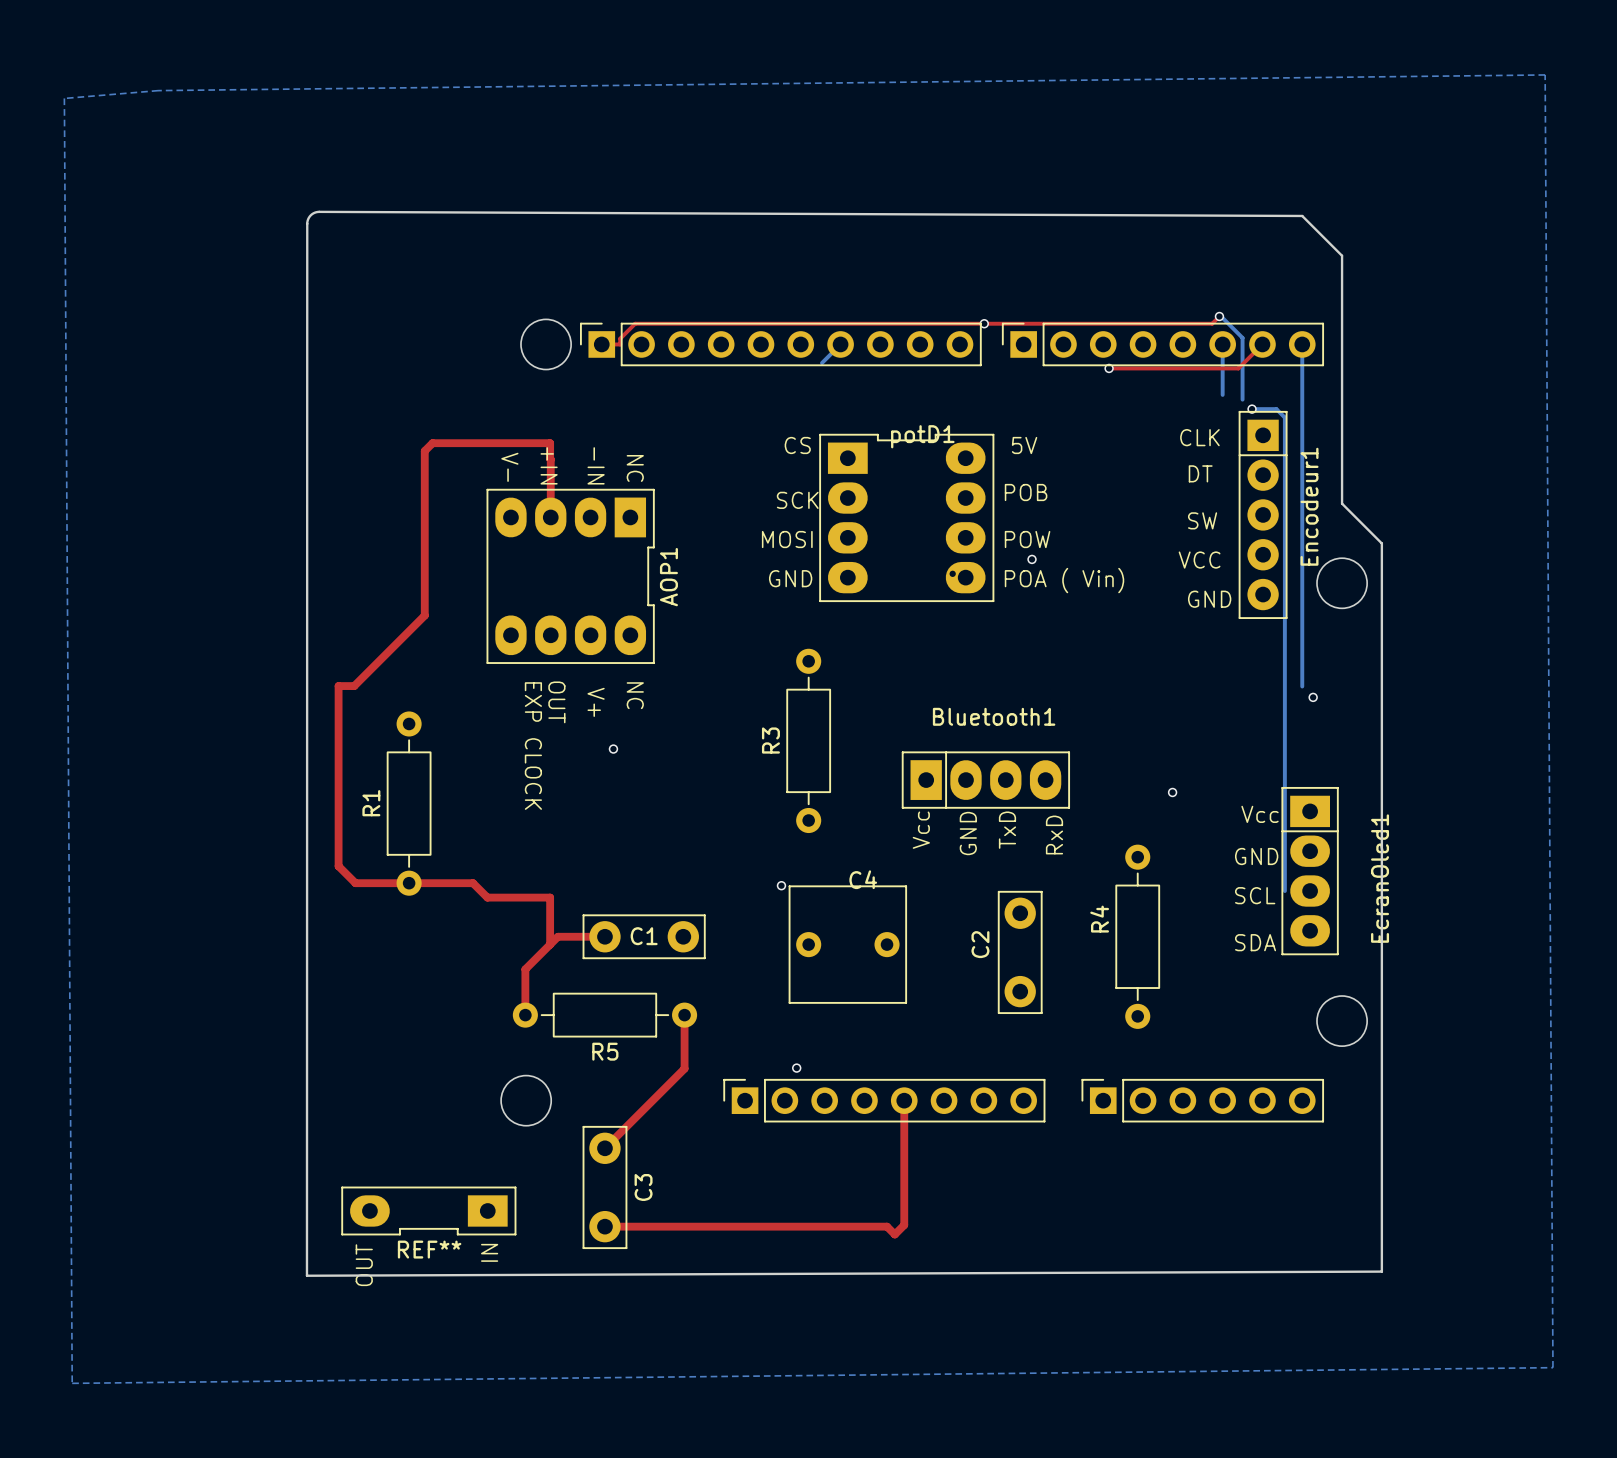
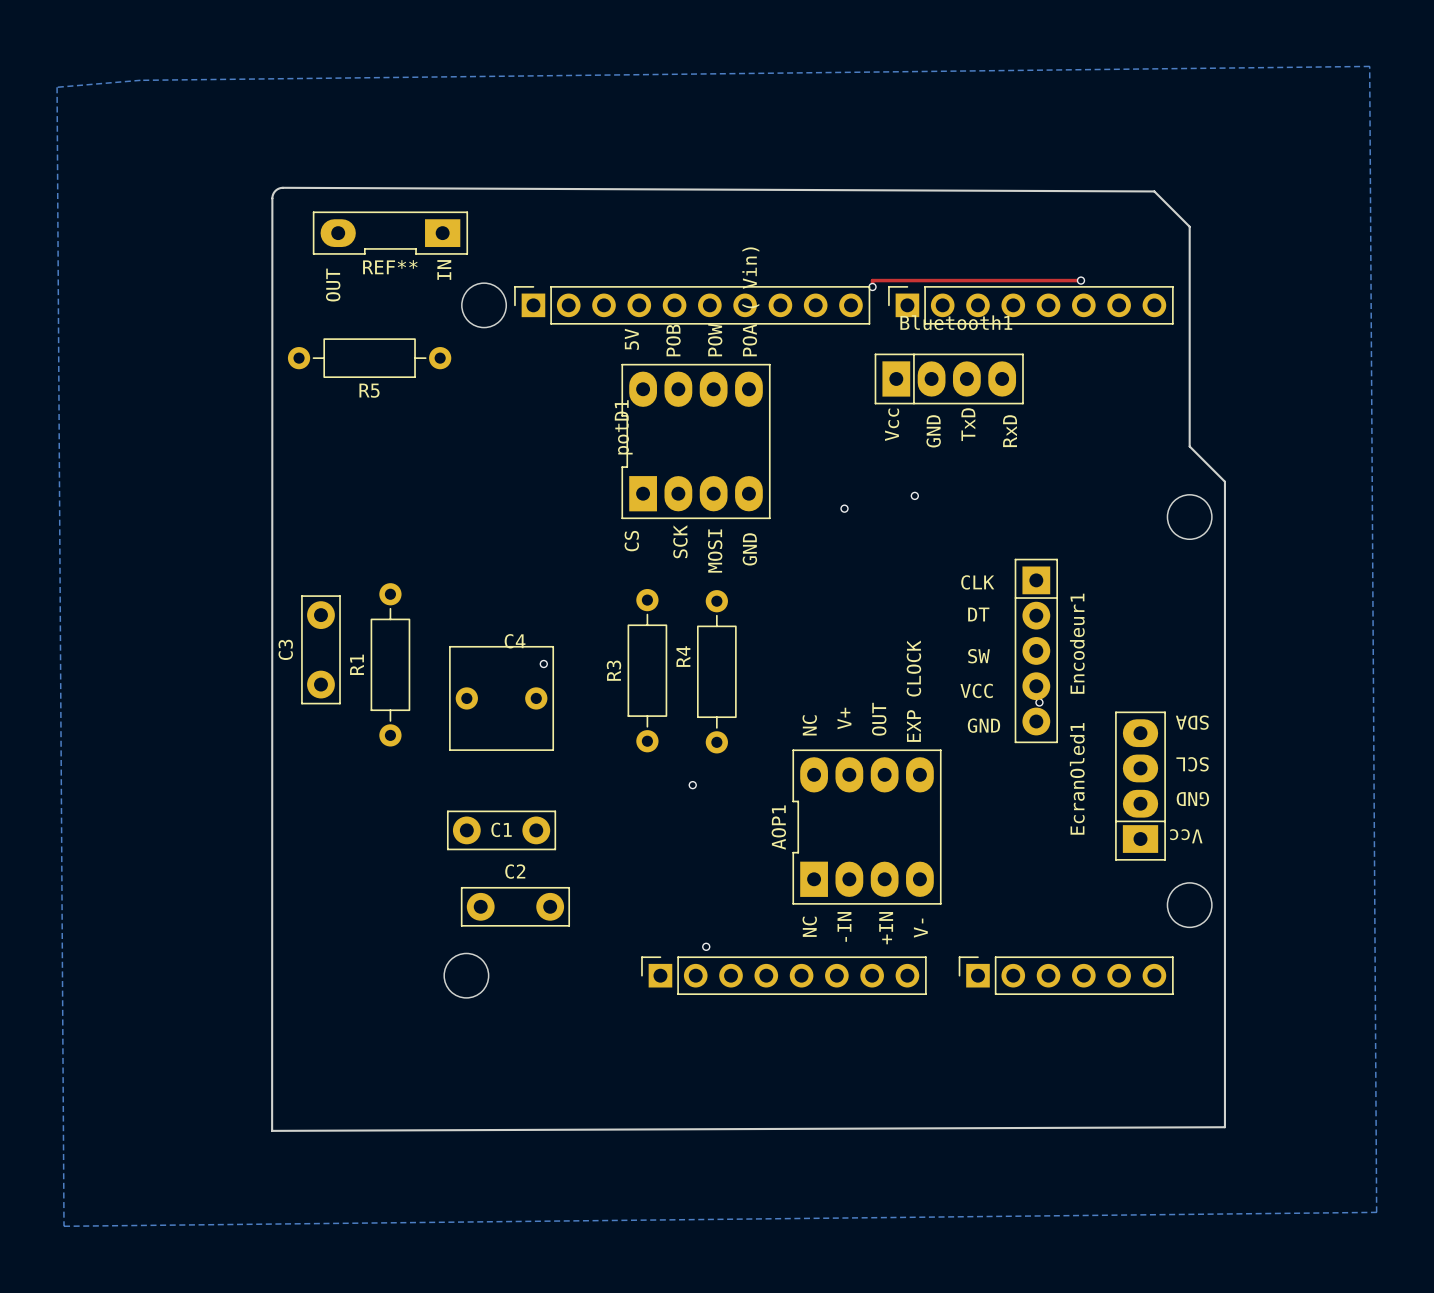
REF**: none -> (390, 233)
top track: (1219, 316) (1212, 323) (635, 323) (620, 338) (620, 344) (601, 344) -> (1080, 280) (872, 280) (872, 286)
bottom track: (1219, 316) (1242, 337) (1242, 399) -> none
bottom track: (840, 344) (822, 363) -> none
bottom track: (1222, 344) (1222, 394) -> none
top track: (1262, 344) (1238, 368) (1109, 368) -> none
bottom track: (1302, 344) (1302, 686) -> none
via: (1109, 368) -> none
bottom track: (1252, 409) (1276, 409) (1284, 417) (1284, 891) -> none
via: (1252, 409) -> none
text: -IN (596, 465) -> none
AOP1 footprint: [486, 488, 655, 664] -> [792, 749, 942, 905]
Encodeur1 position: (1263, 514) -> (1036, 650)
top track: (550, 517) (550, 443) (432, 443) (424, 451) (424, 615) (354, 686) (338, 686) (338, 866) (355, 883) (473, 883) (487, 897) (550, 897) (550, 944) -> none
potD1 rotation: 0° (906, 517) -> 90° counterclockwise (696, 441)
potD1 position: (906, 517) -> (696, 441)
AOP1 name position: AOP1 (668, 577) -> AOP1 (778, 827)
via: (1313, 697) -> none
R3 position: (808, 740) -> (647, 670)
Bluetooth1 position: (985, 780) -> (949, 378)
R1 position: (409, 803) -> (390, 664)
EcranOled1 rotation: 0° (1310, 871) -> 180° (1140, 786)
top track: (604, 936) (557, 936) (525, 969) (525, 1015) -> none
C1 position: (644, 936) -> (501, 830)
R4 position: (1137, 936) -> (716, 671)
C4 position: (847, 944) -> (501, 698)
C2 rotation: 0° (1020, 952) -> 90° clockwise (515, 906)
C2 position: (1020, 952) -> (515, 906)
R5 position: (604, 1015) -> (369, 358)
top track: (684, 1015) (684, 1068) (604, 1148) -> none
top track: (904, 1100) (904, 1225) (894, 1234) (887, 1226) (604, 1226) -> none
C3 position: (604, 1187) -> (320, 649)
C3 name position: C3 (643, 1187) -> C3 (285, 649)
REF**: (428, 1210) -> none

